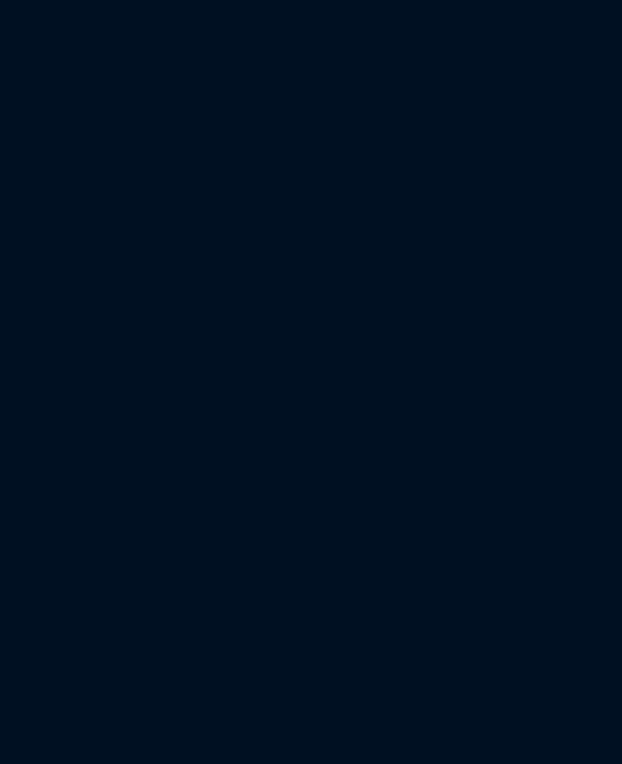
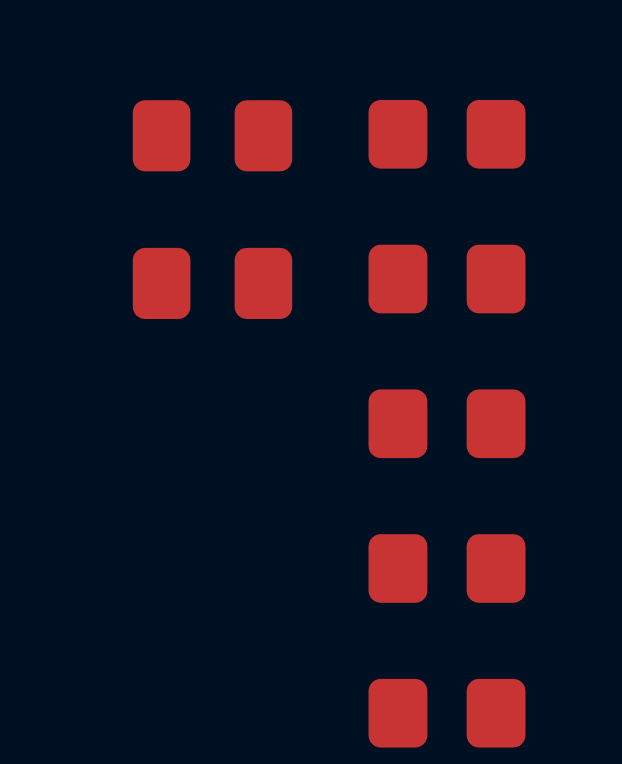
part: none -> (447, 134)
part: none -> (212, 135)
part: none -> (447, 279)
part: none -> (212, 283)
part: none -> (447, 423)
part: none -> (447, 568)
part: none -> (447, 713)

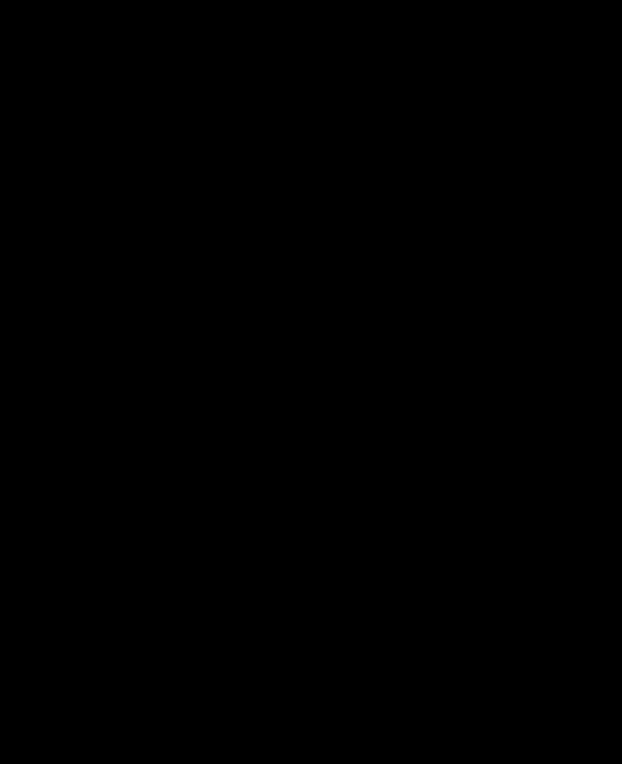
part: (447, 134) -> none
part: (212, 135) -> none
part: (447, 279) -> none
part: (212, 283) -> none
part: (447, 423) -> none
part: (447, 568) -> none
part: (447, 713) -> none

